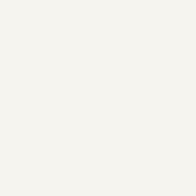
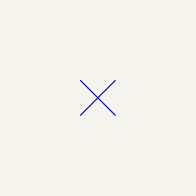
no-connect mark: none -> (97, 97)

